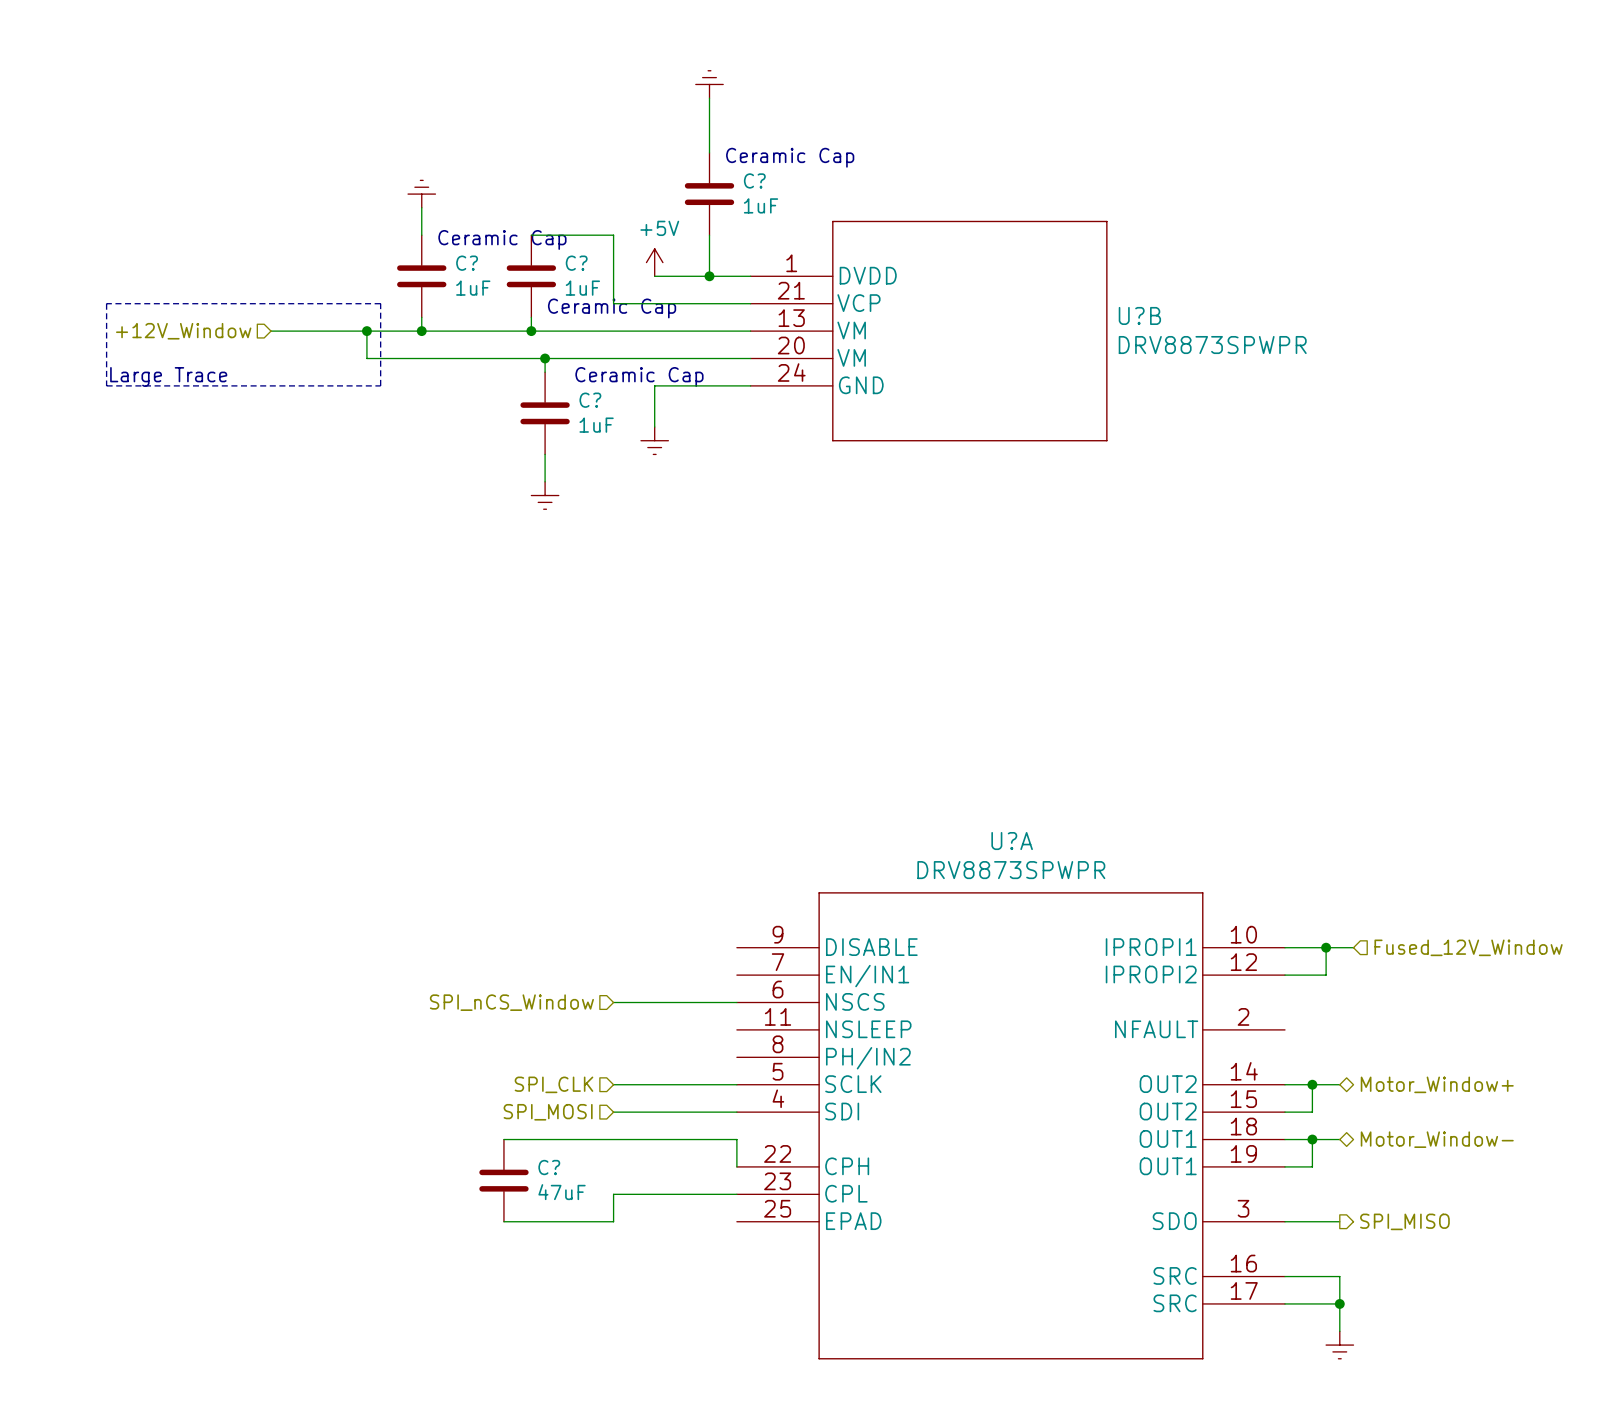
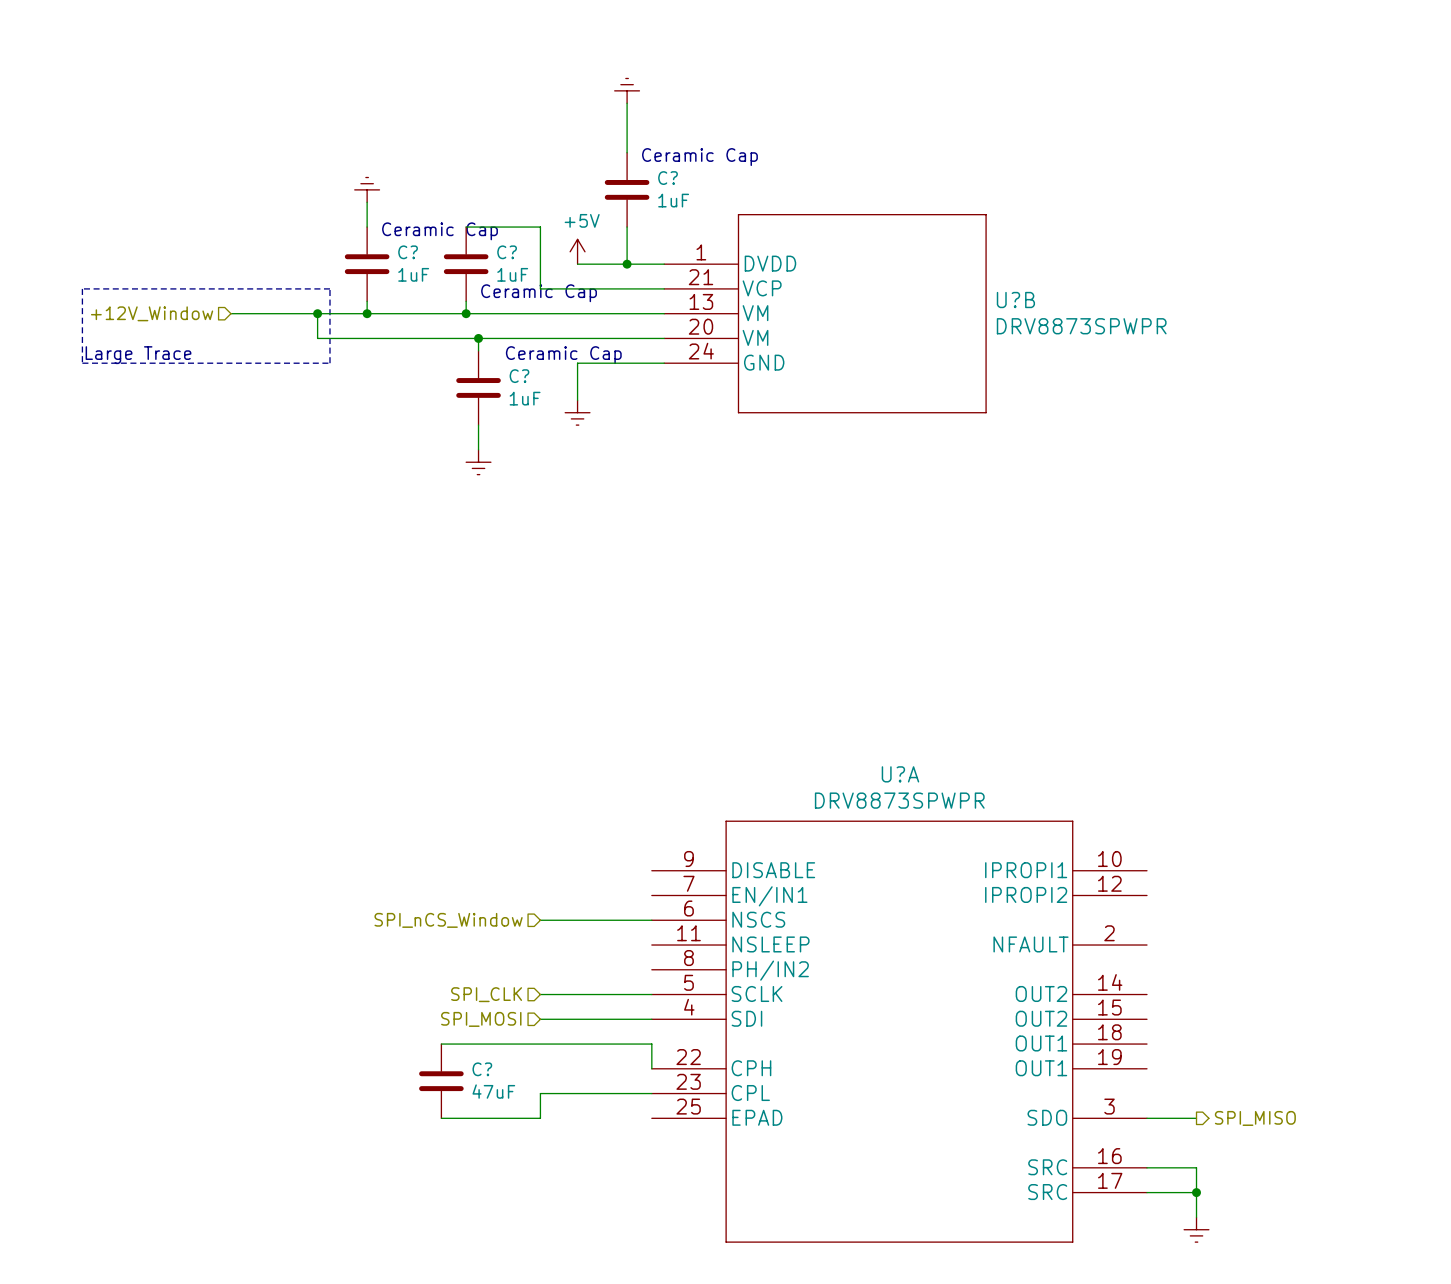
wire: (1284, 947) (1353, 947) -> none
wire: (1326, 947) (1326, 975) (1284, 975) -> none
junction: (1326, 947) -> none
hierarchical label: Fused_12V_Window (1468, 947) -> none
wire: (1284, 1084) (1339, 1084) -> none
wire: (1312, 1084) (1312, 1112) (1284, 1112) -> none
junction: (1312, 1084) -> none
hierarchical label: Motor_Window+ (1437, 1084) -> none
wire: (1284, 1139) (1339, 1139) -> none
wire: (1312, 1139) (1312, 1166) (1284, 1166) -> none
junction: (1312, 1139) -> none
hierarchical label: Motor_Window- (1437, 1139) -> none

